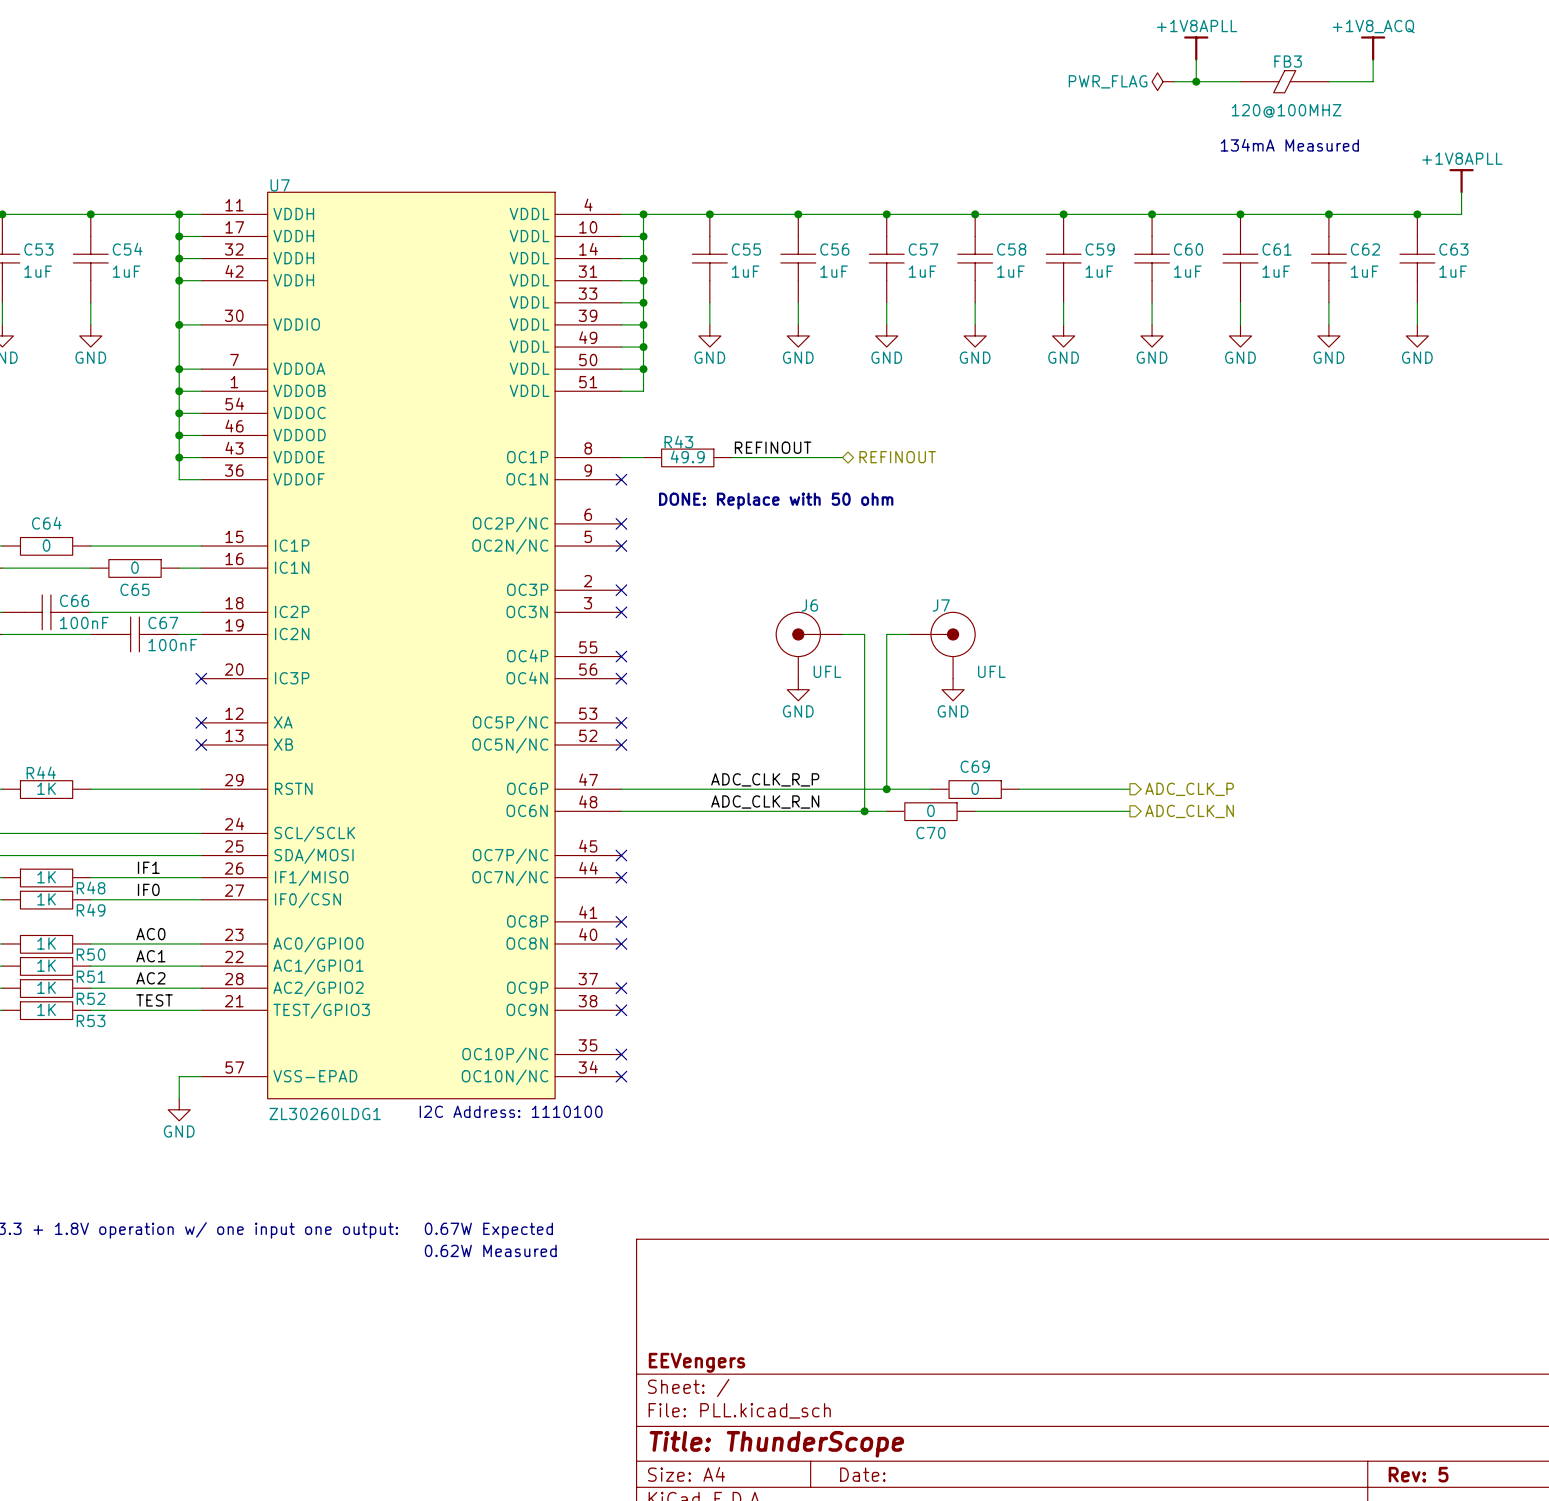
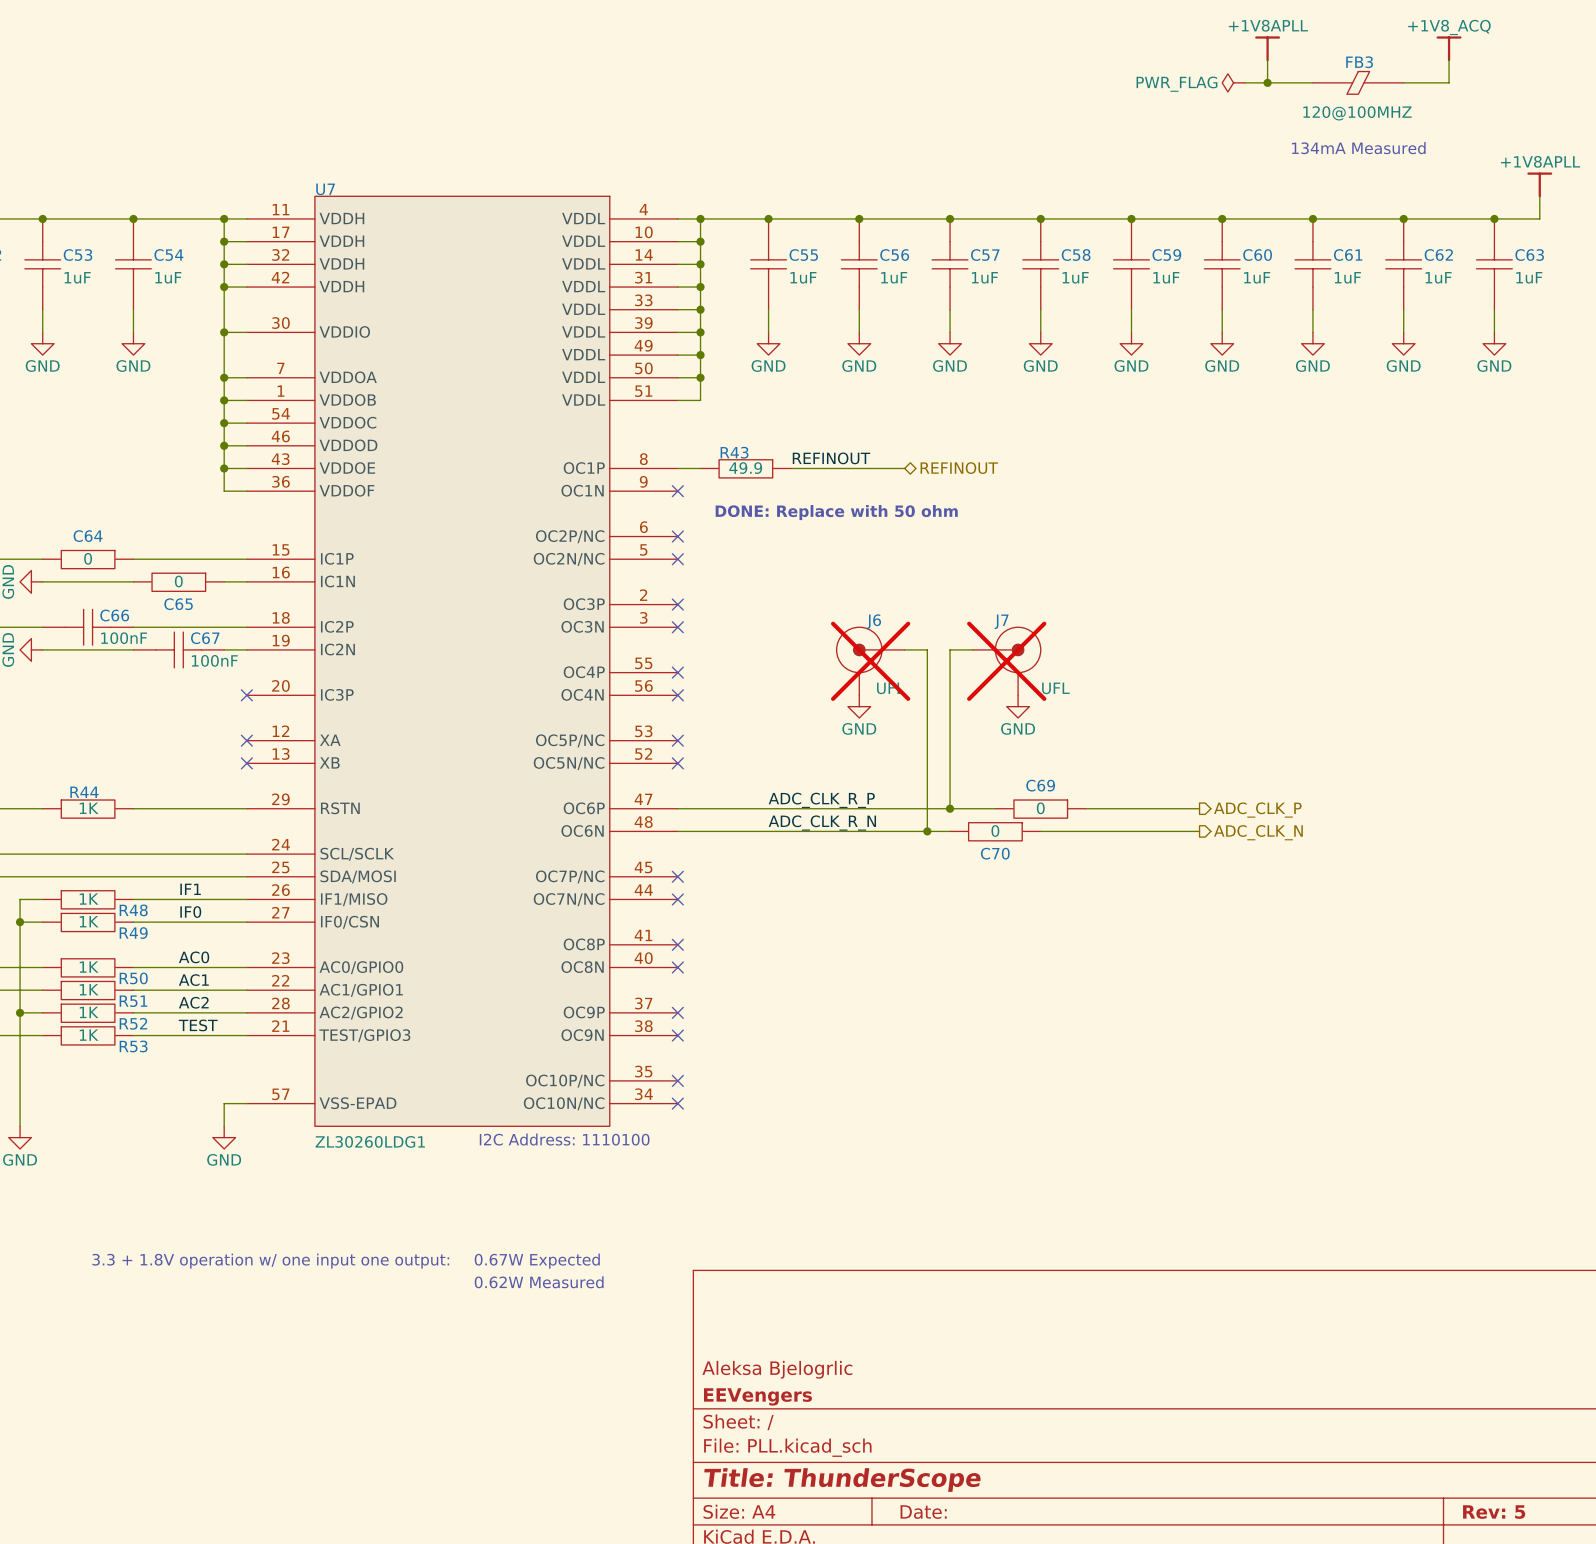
J6 do-not-place cross: none -> (870, 661)
J7 do-not-place cross: none -> (1006, 661)
title block: none -> Aleksa Bjelogrlic (777, 1369)

